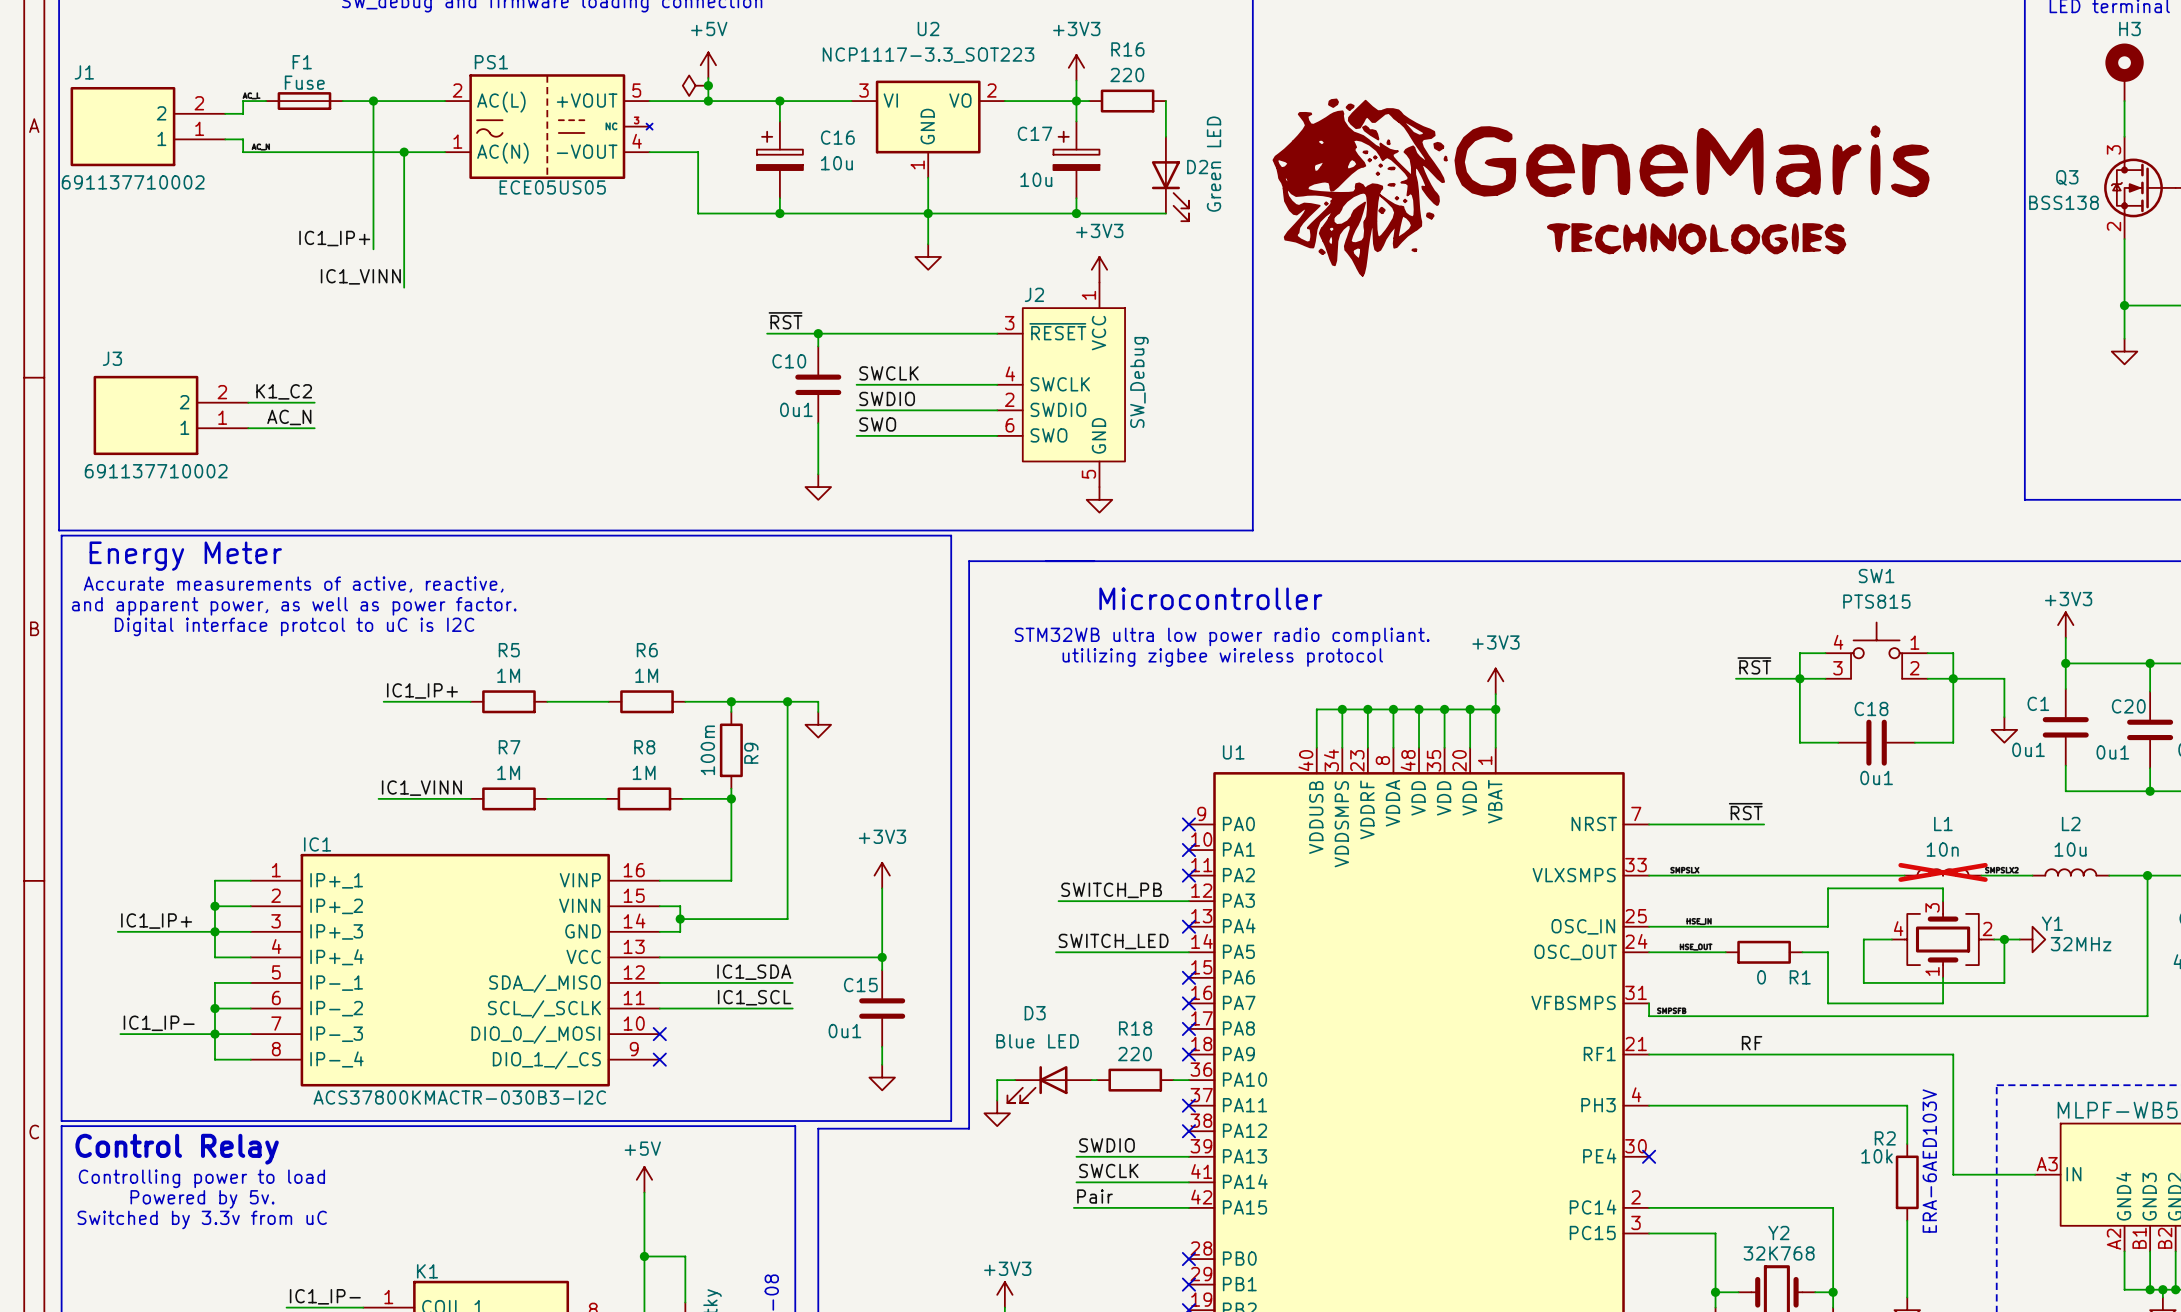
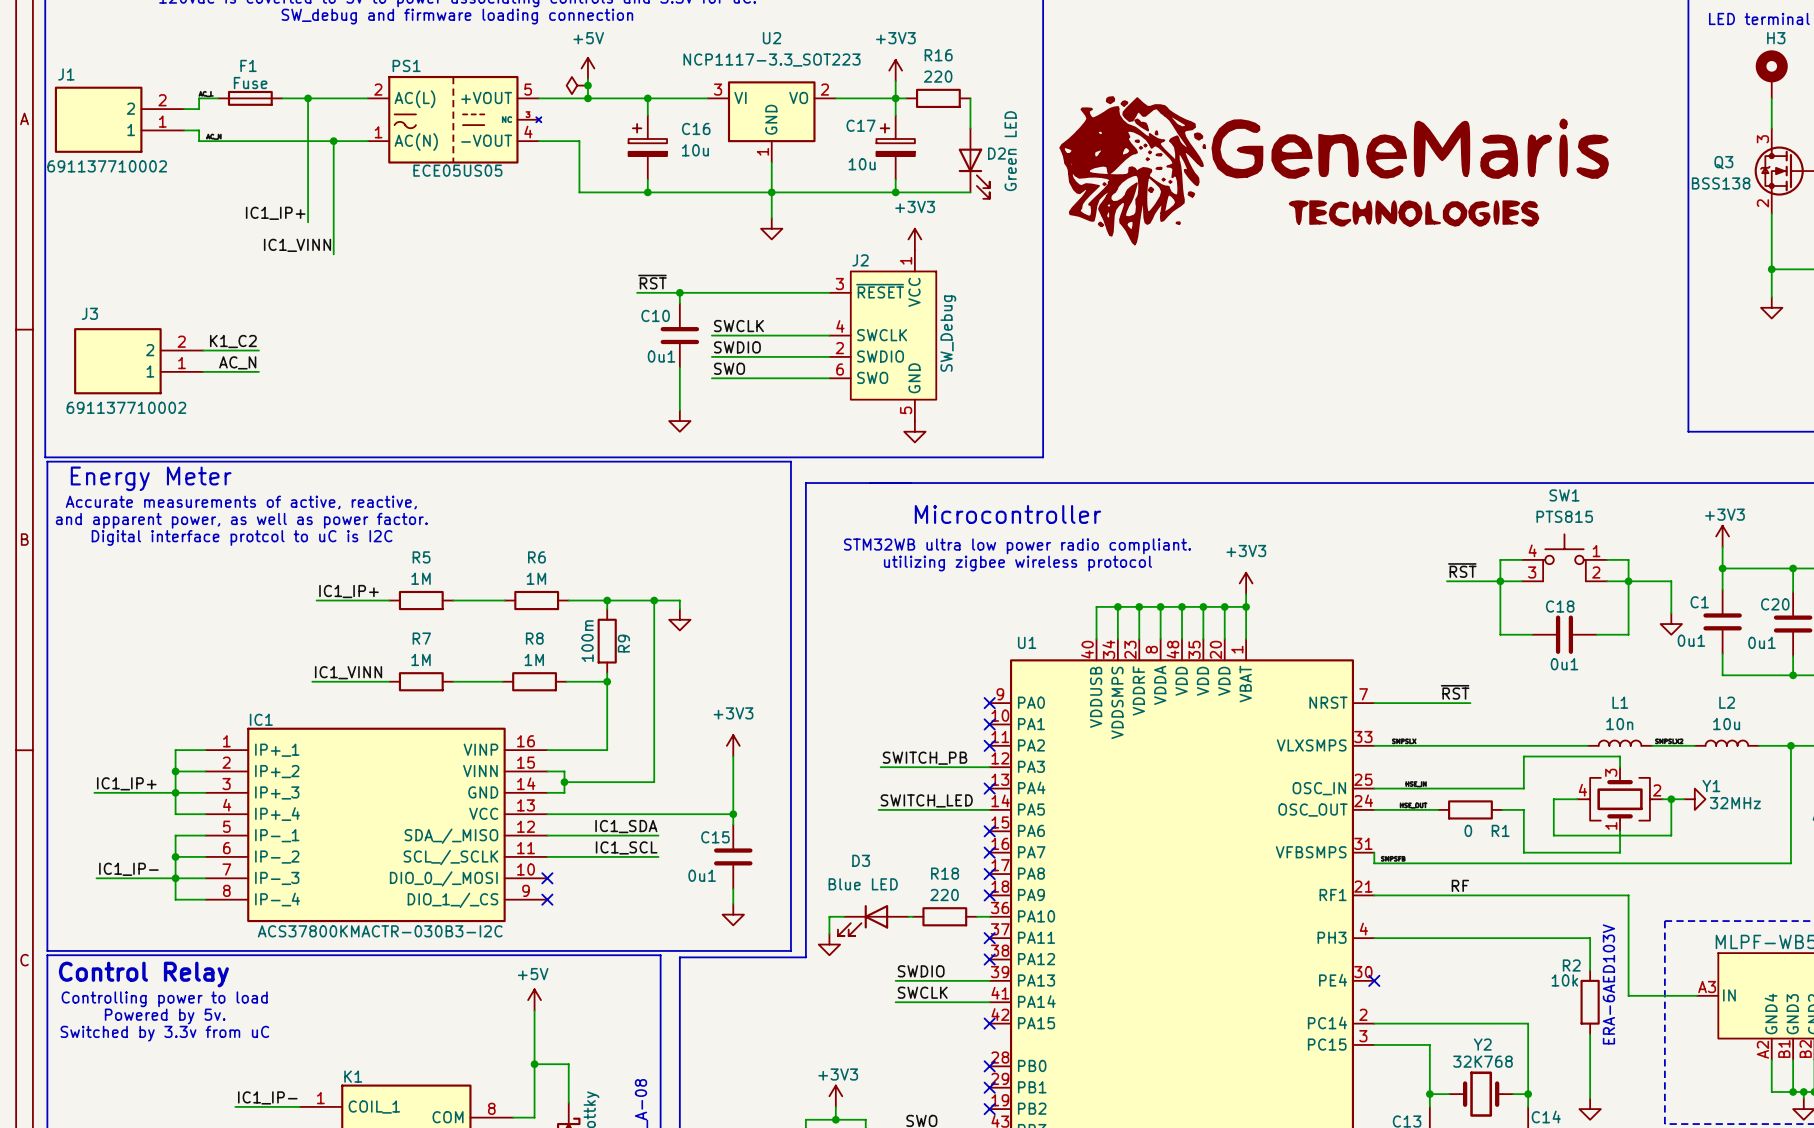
L1 do-not-place cross: (1943, 872) -> none
label: Pair (1095, 1196) -> none
wire: (1073, 1207) (1188, 1207) -> none
no-connect mark: none -> (989, 1023)

